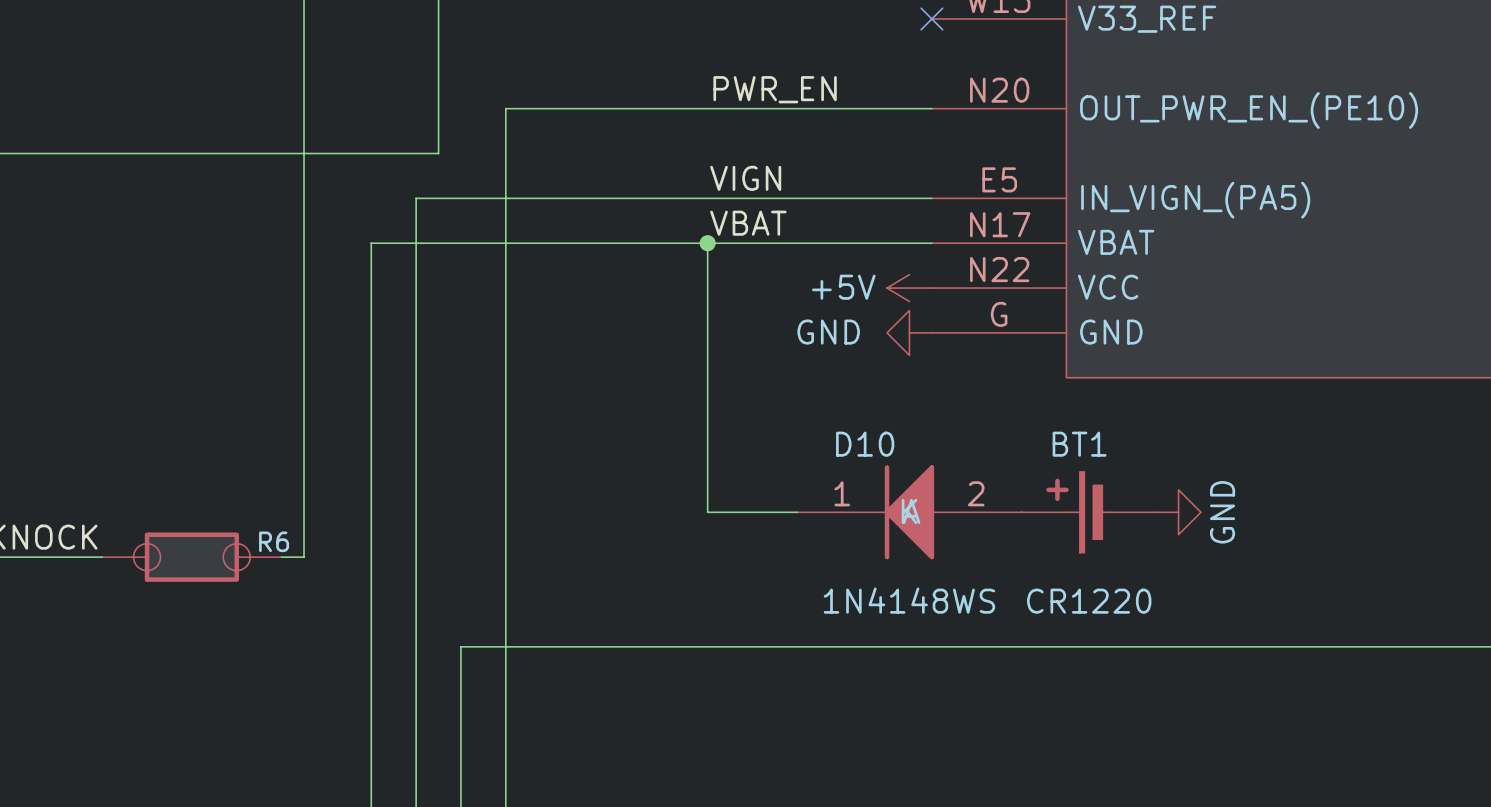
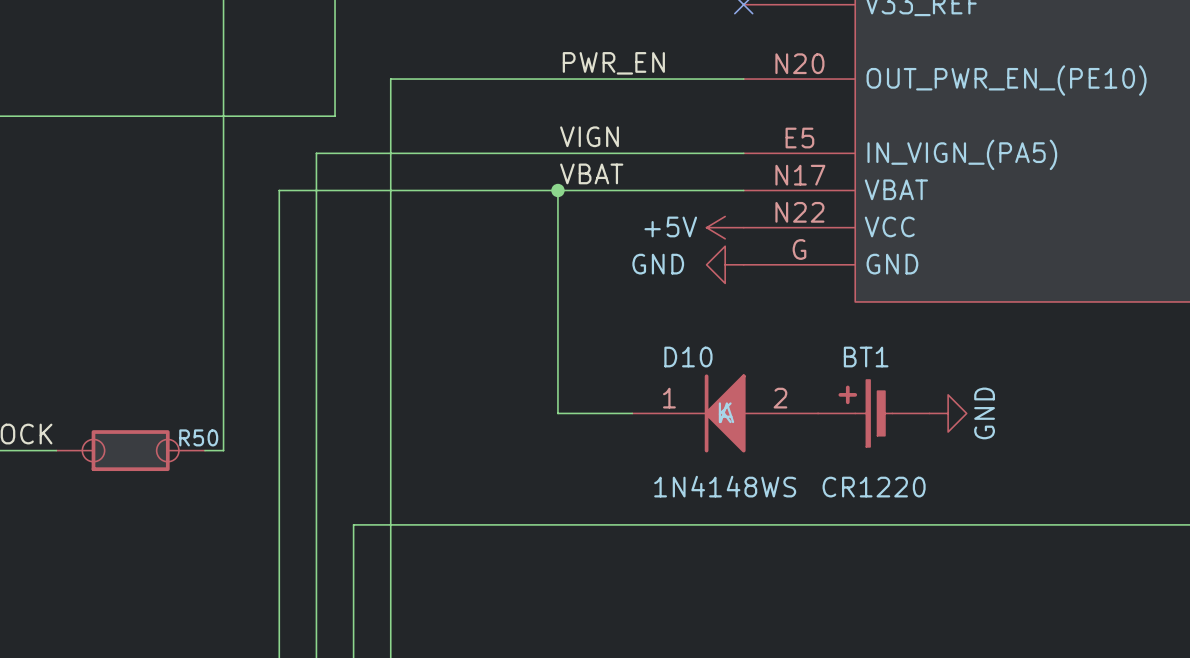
R6 name: R6 (274, 541) -> R50 (198, 437)

